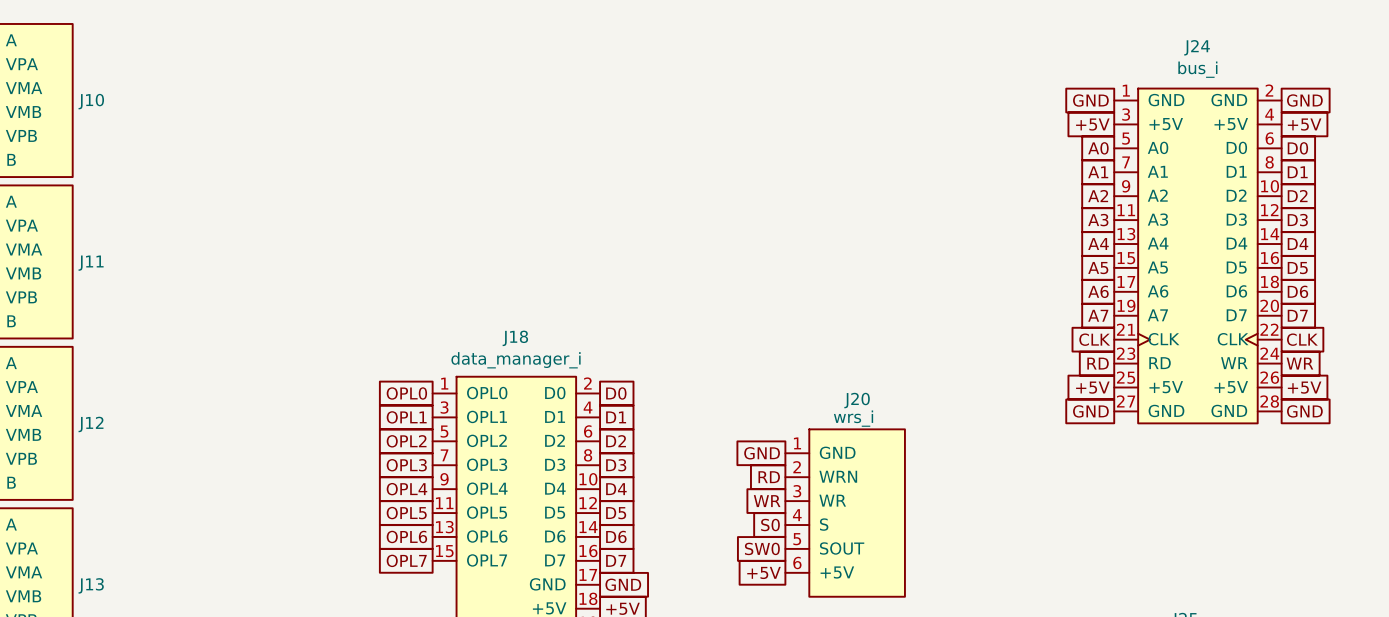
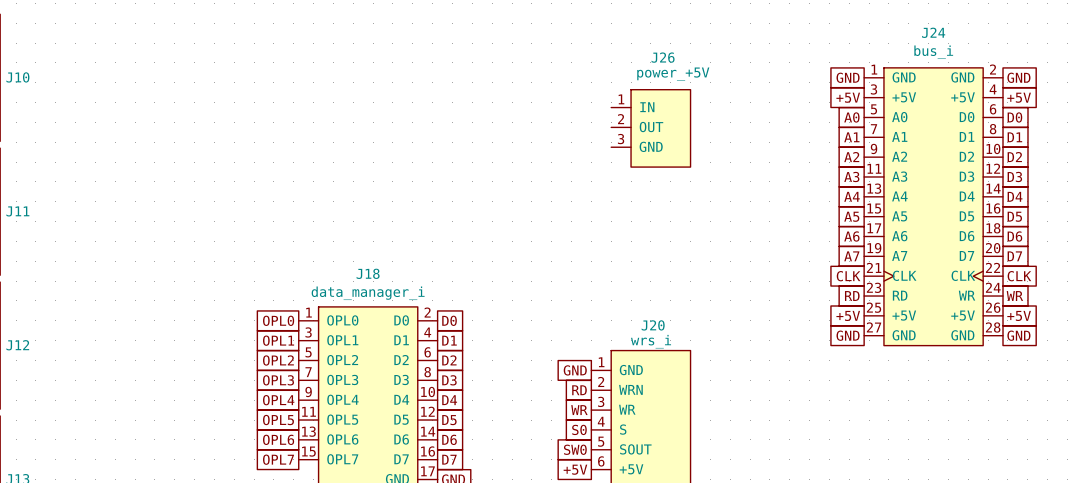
J26: none -> power_+5V (650, 128)

